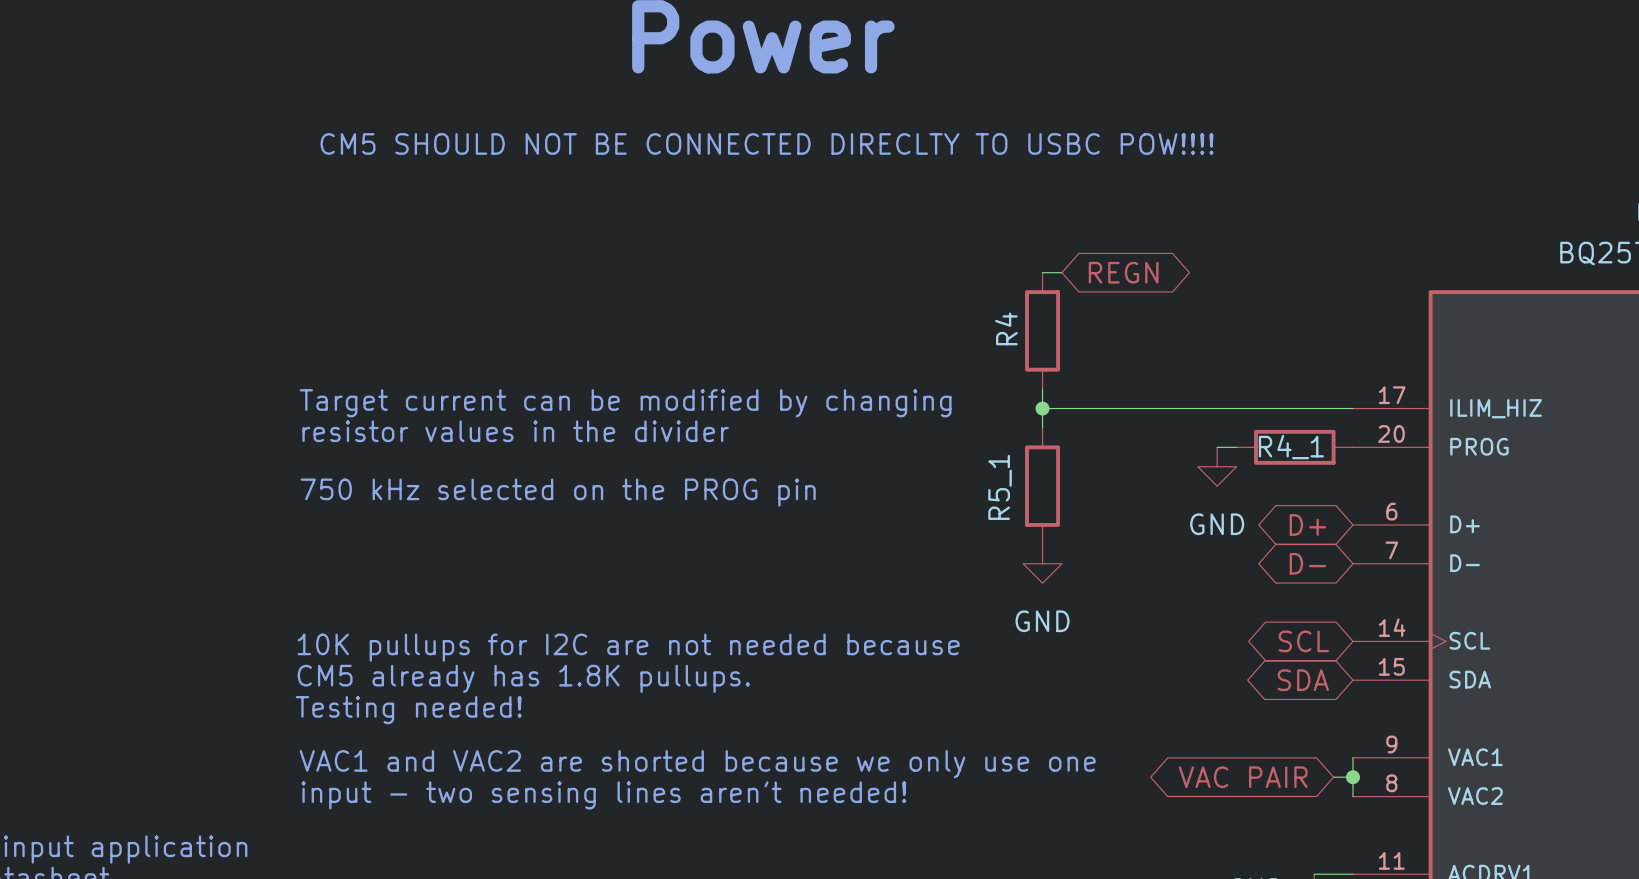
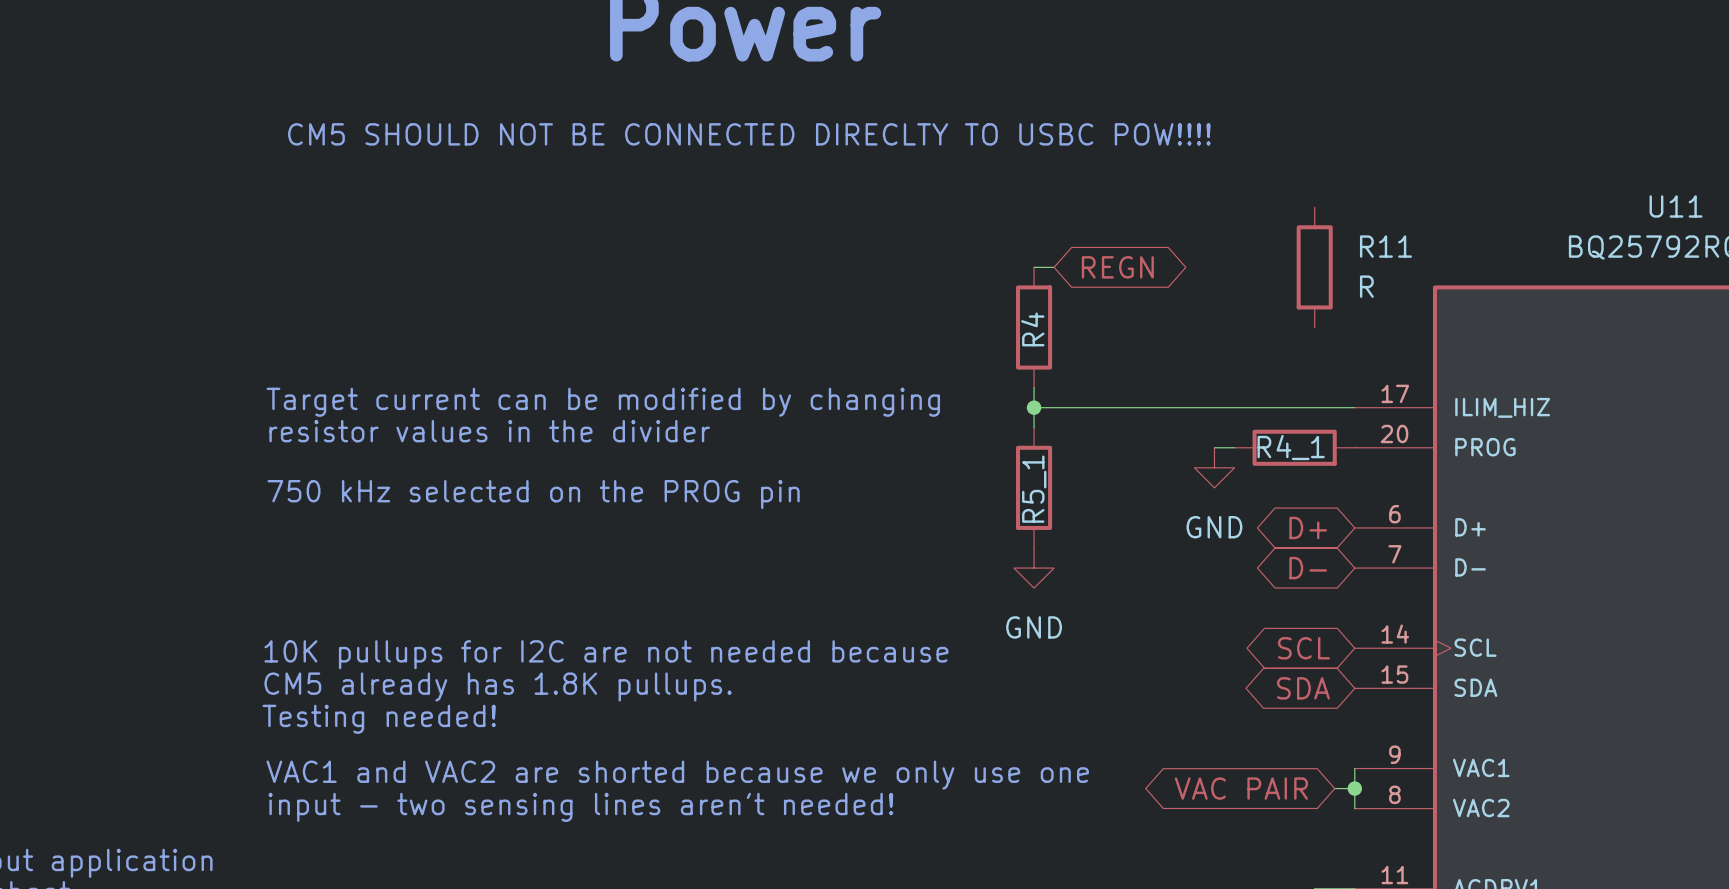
R11: none -> R (1314, 267)
R4 name position: R4 (1006, 328) -> R4 (1032, 329)
R5_1 name position: R5_1 (1000, 487) -> R5_1 (1034, 489)

